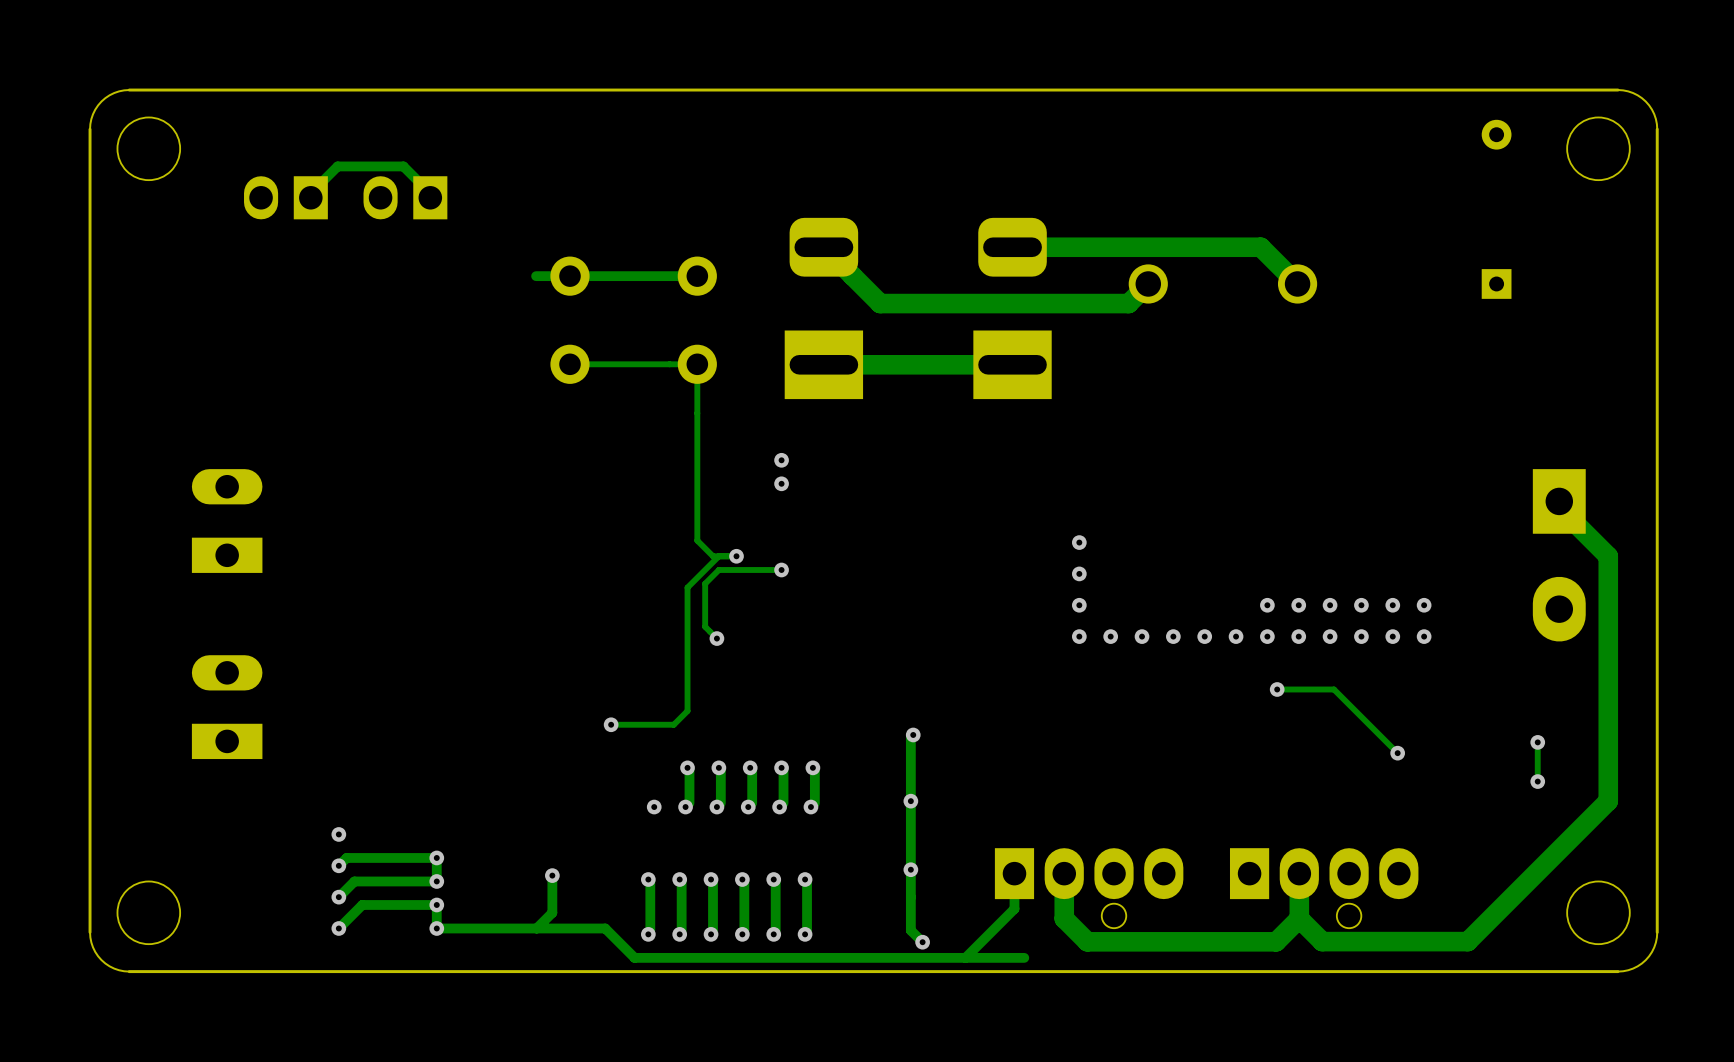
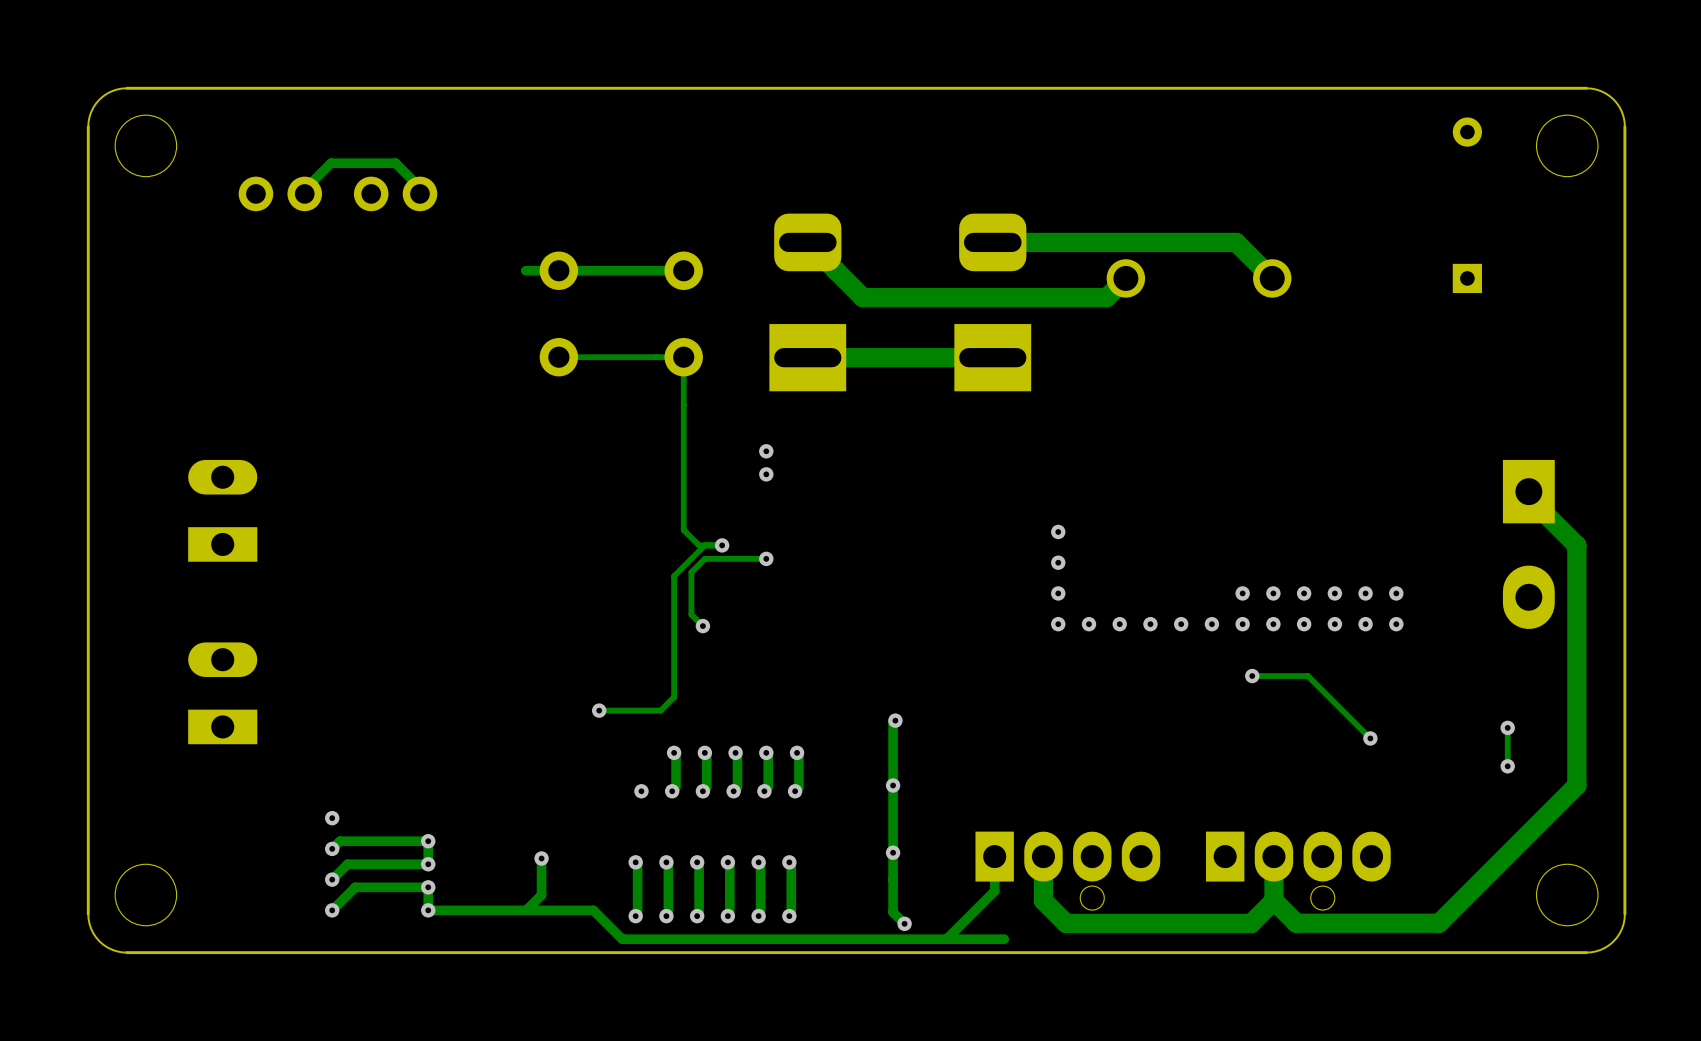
part footprint: [244, 176, 328, 220] -> [238, 176, 323, 212]
part footprint: [363, 176, 448, 220] -> [353, 176, 438, 212]

